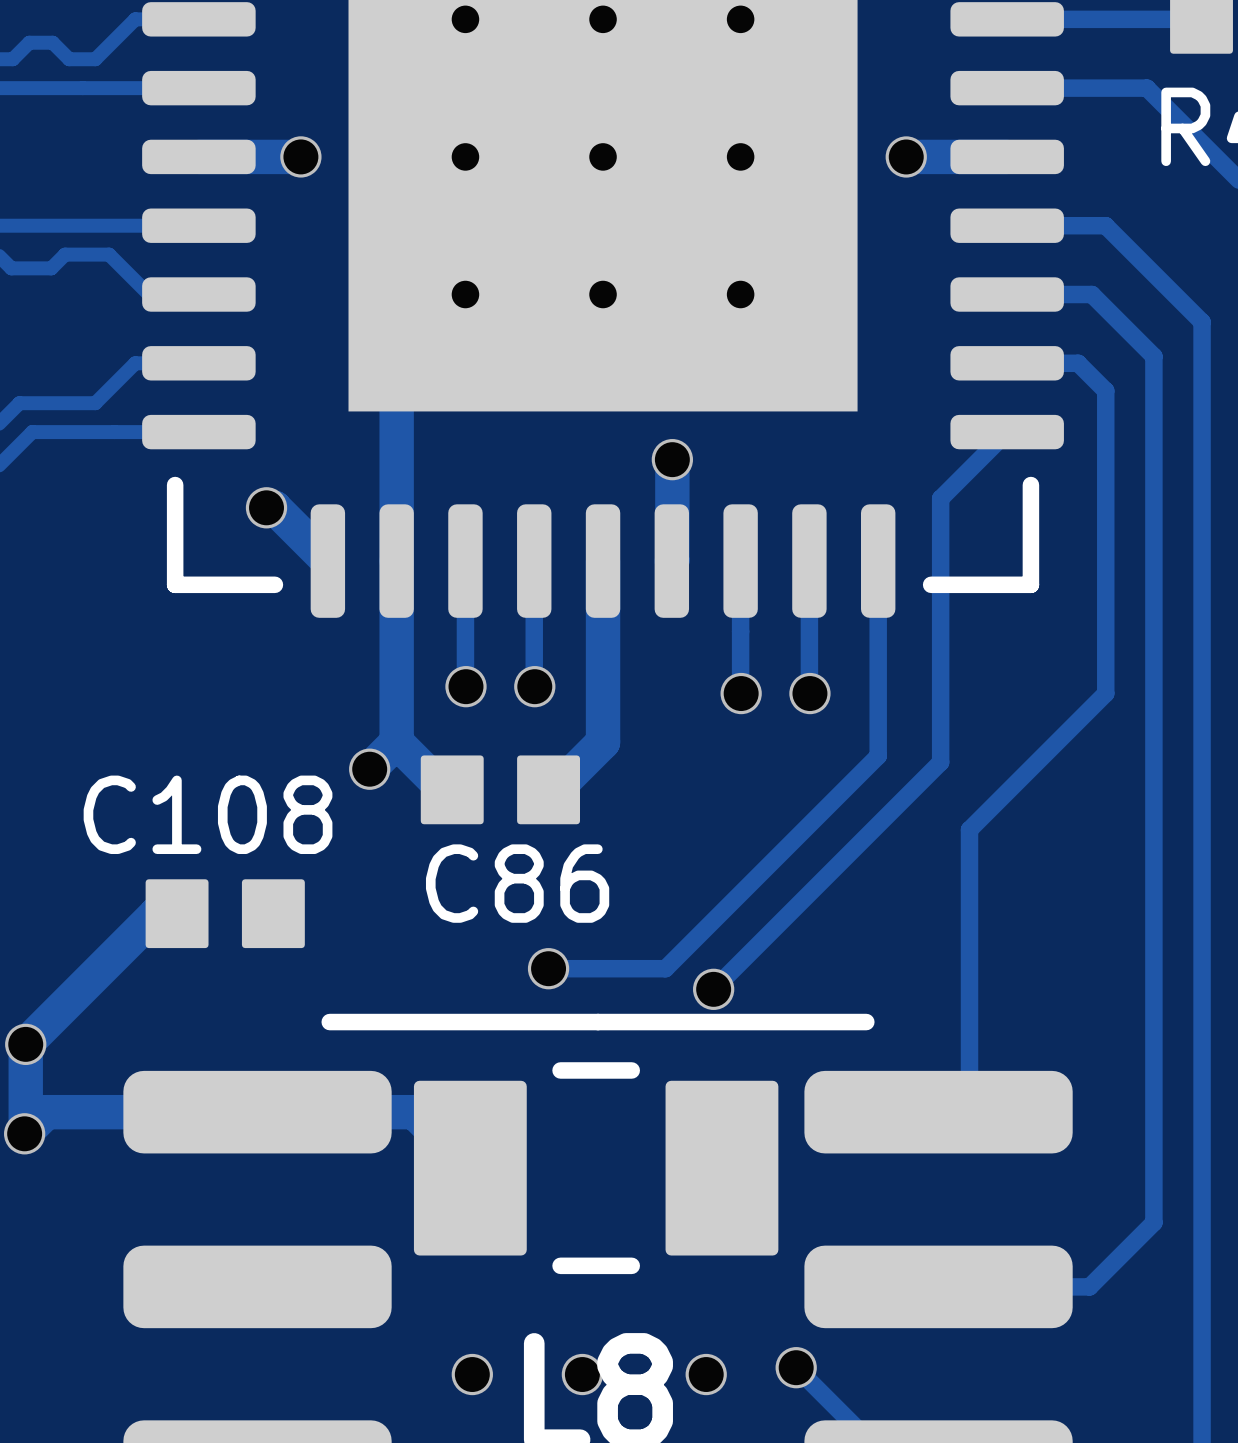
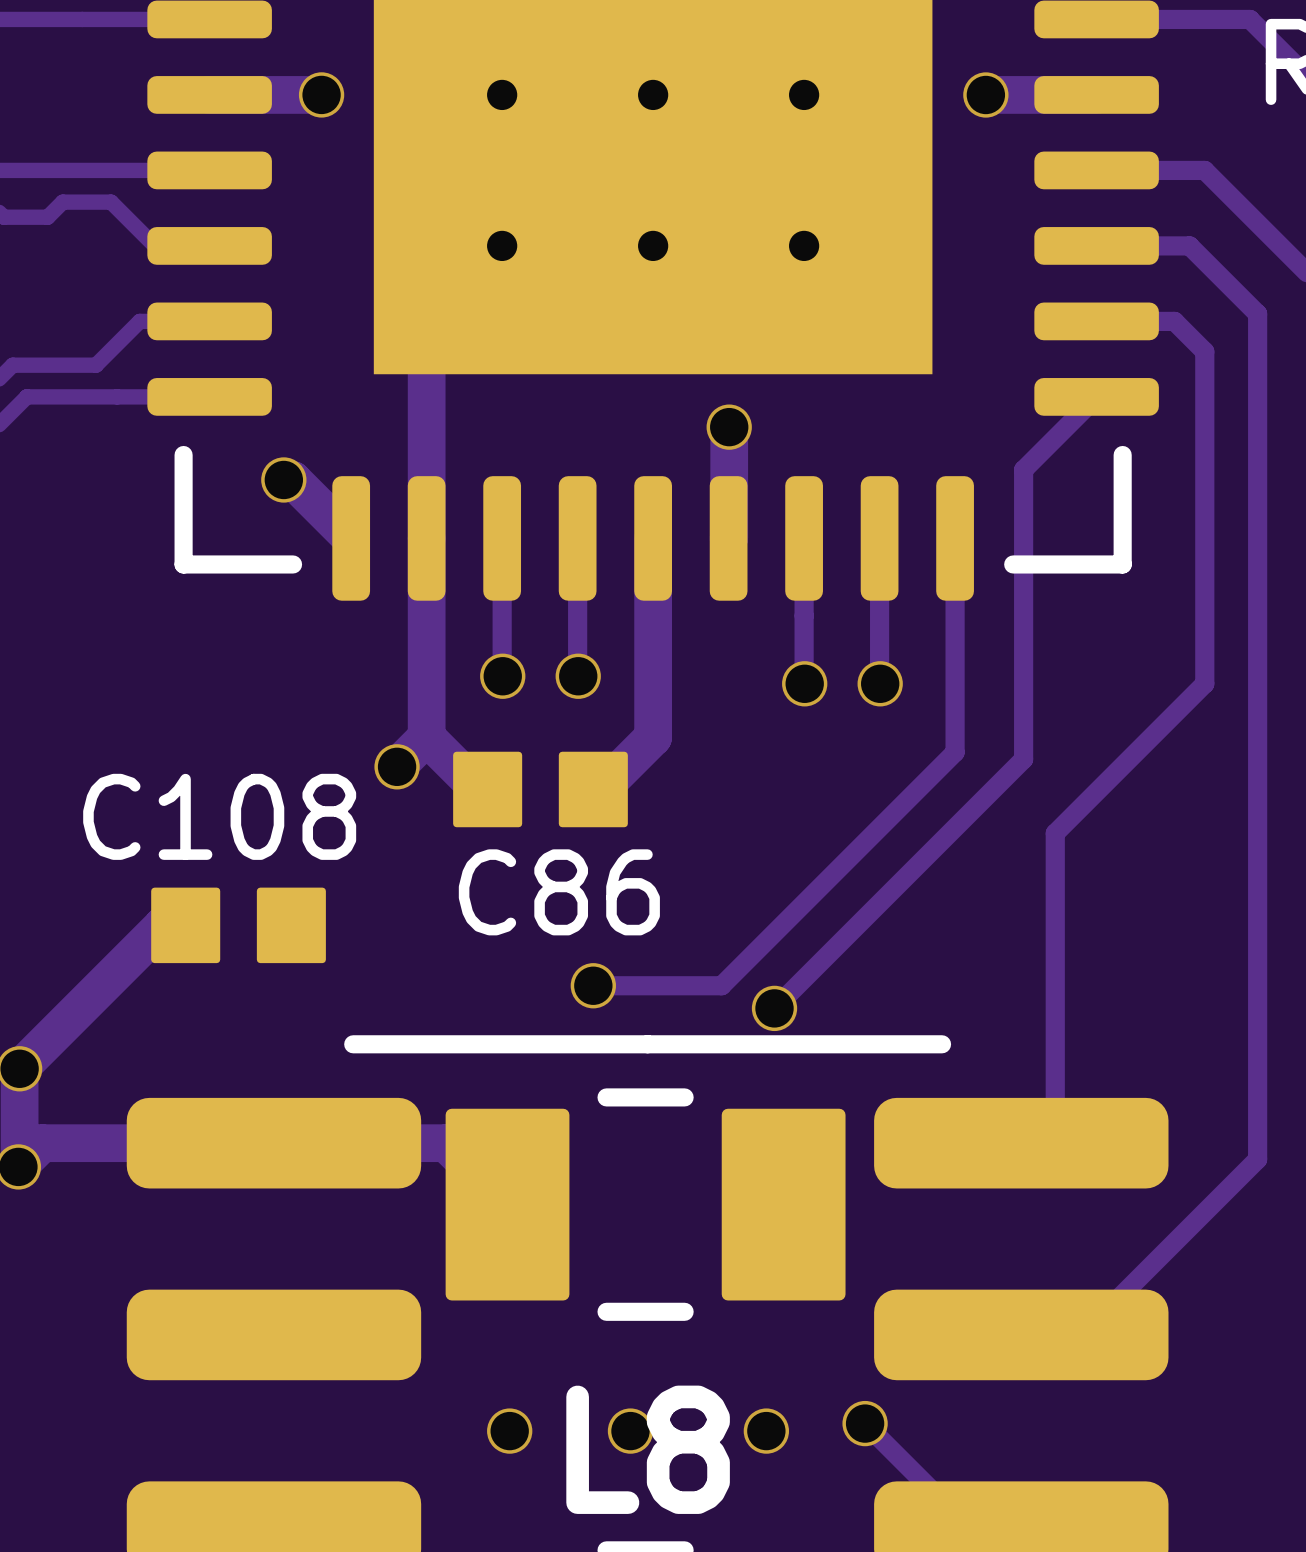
track: (1153, 1126) (1153, 1222) (1089, 1286) (993, 1286) -> (1257, 1159) (1082, 1334)

